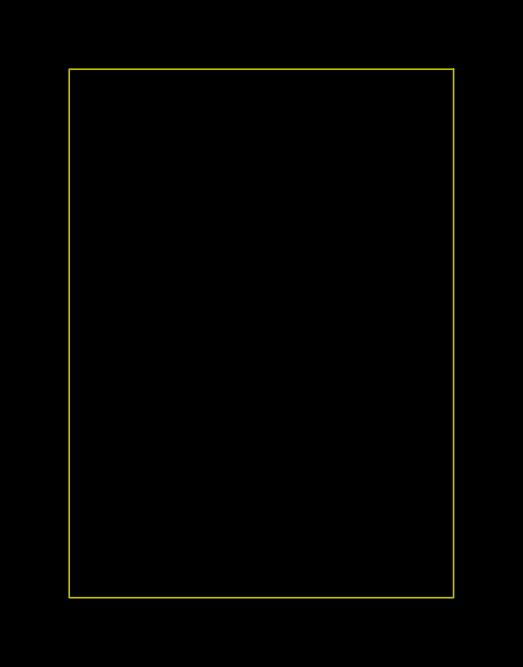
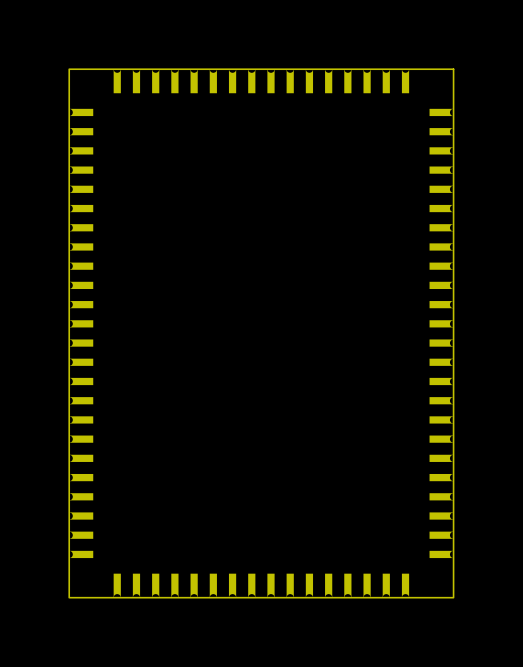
part footprint: [68, 68, 455, 599] -> [65, 65, 458, 602]

